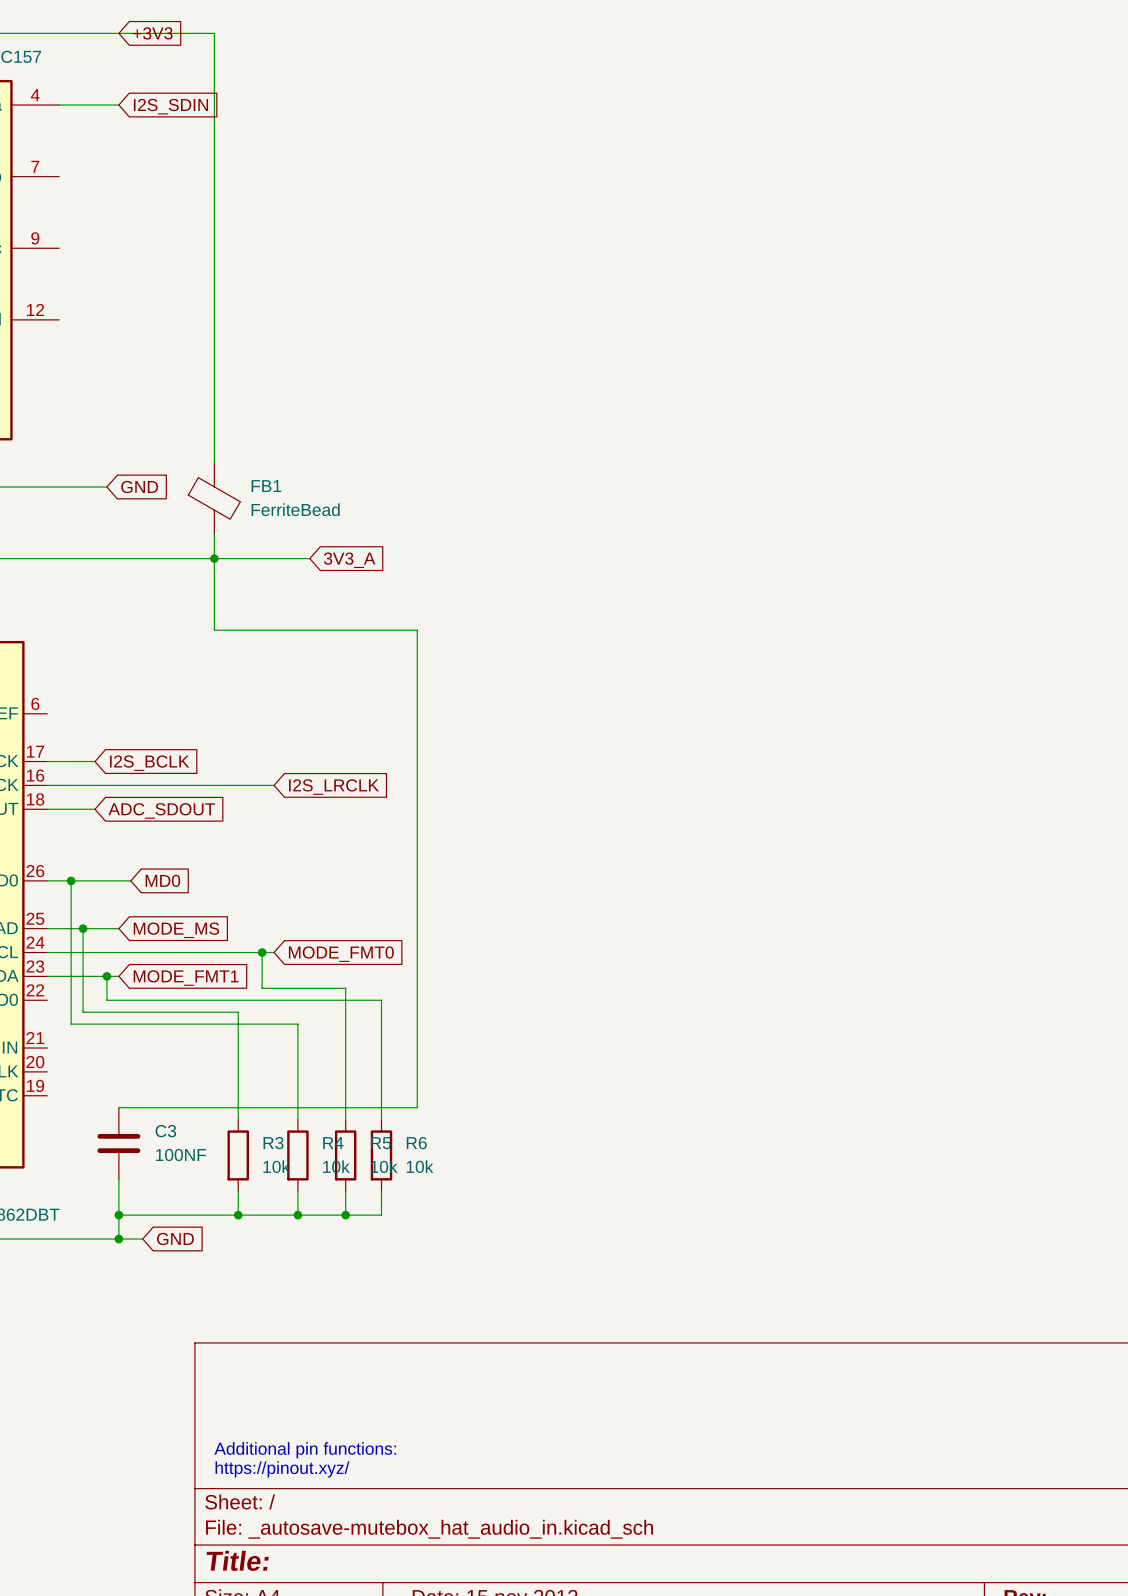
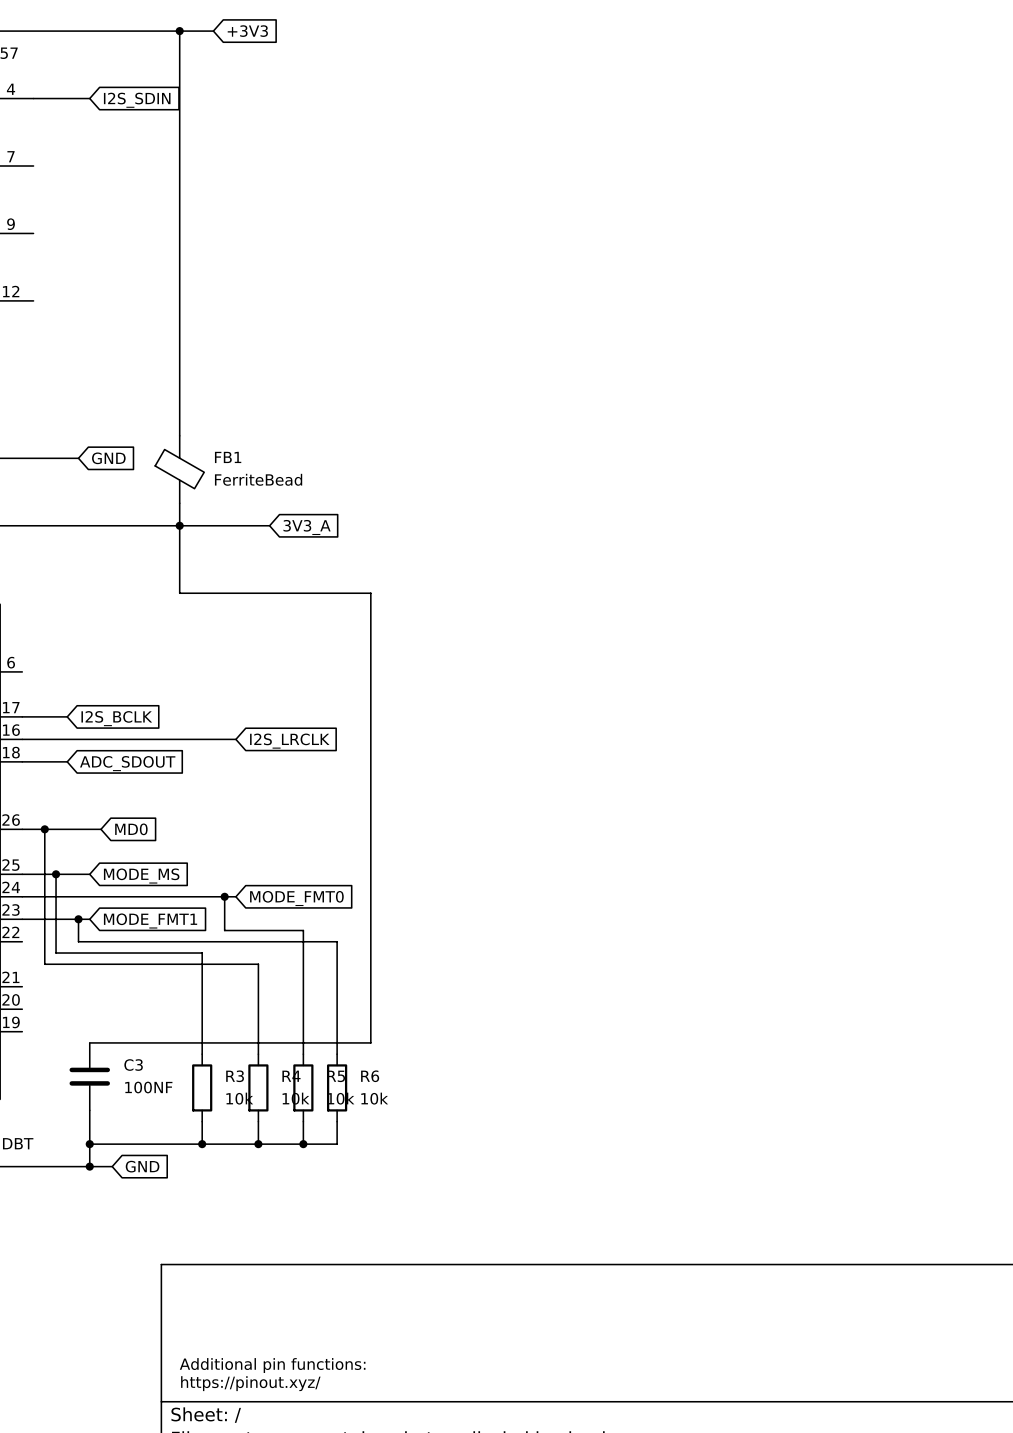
global label position: +3V3 (152, 33) -> +3V3 (247, 31)
wire: none -> (179, 31) (213, 31)
junction: none -> (179, 31)

